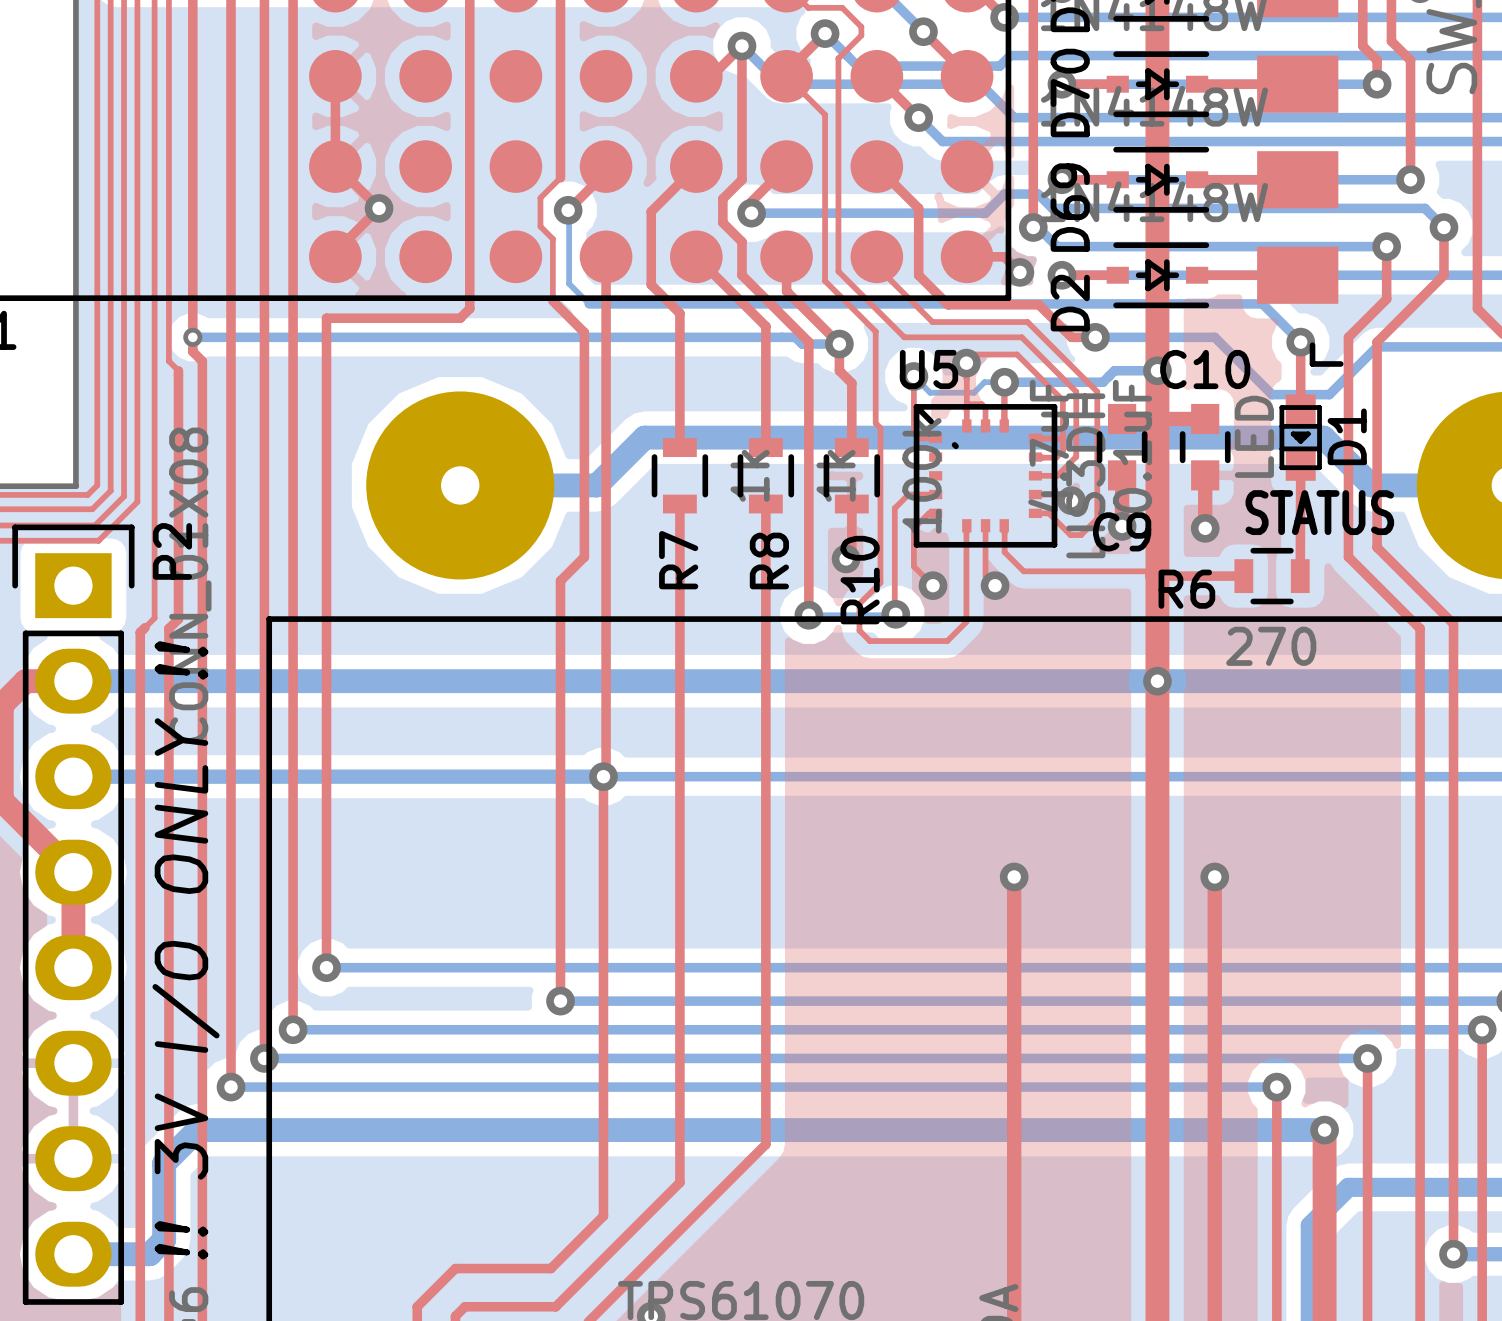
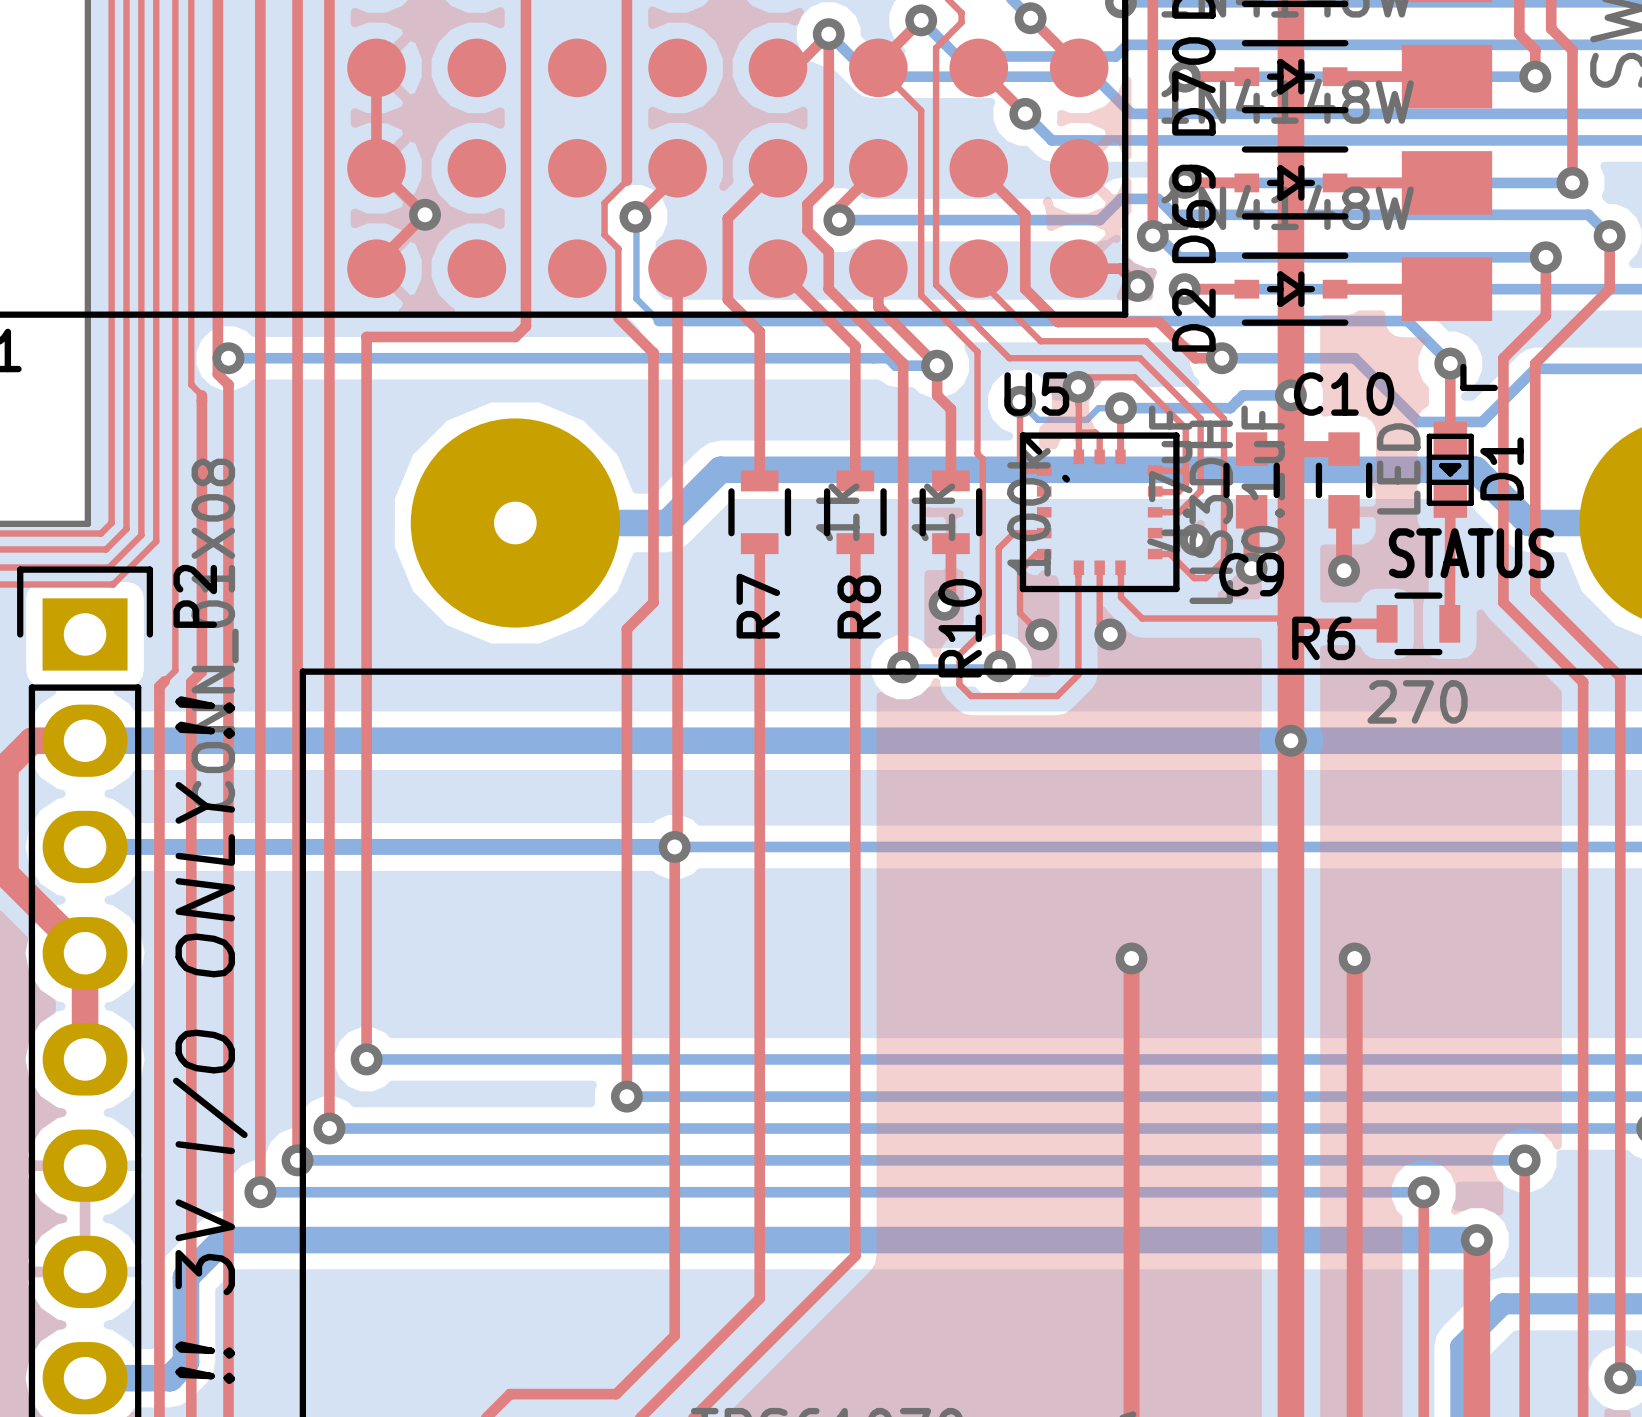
via size: [183, 327, 203, 347] -> [212, 342, 245, 375]

